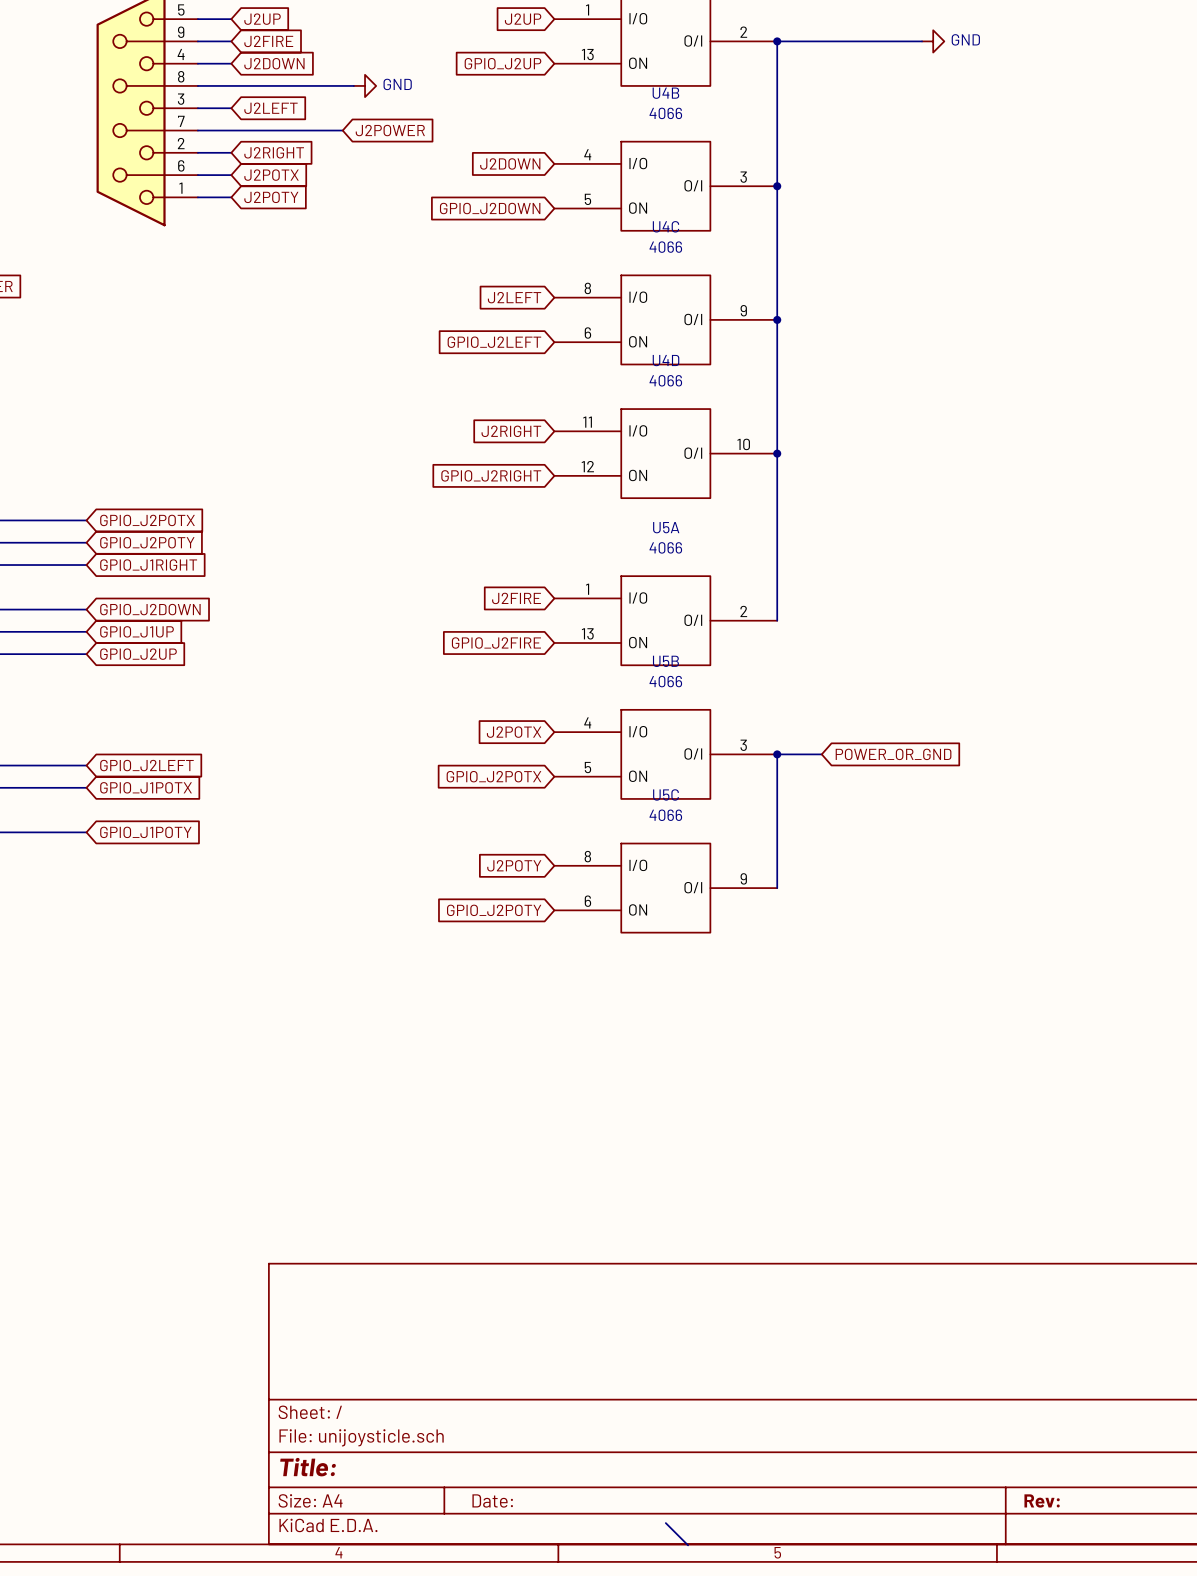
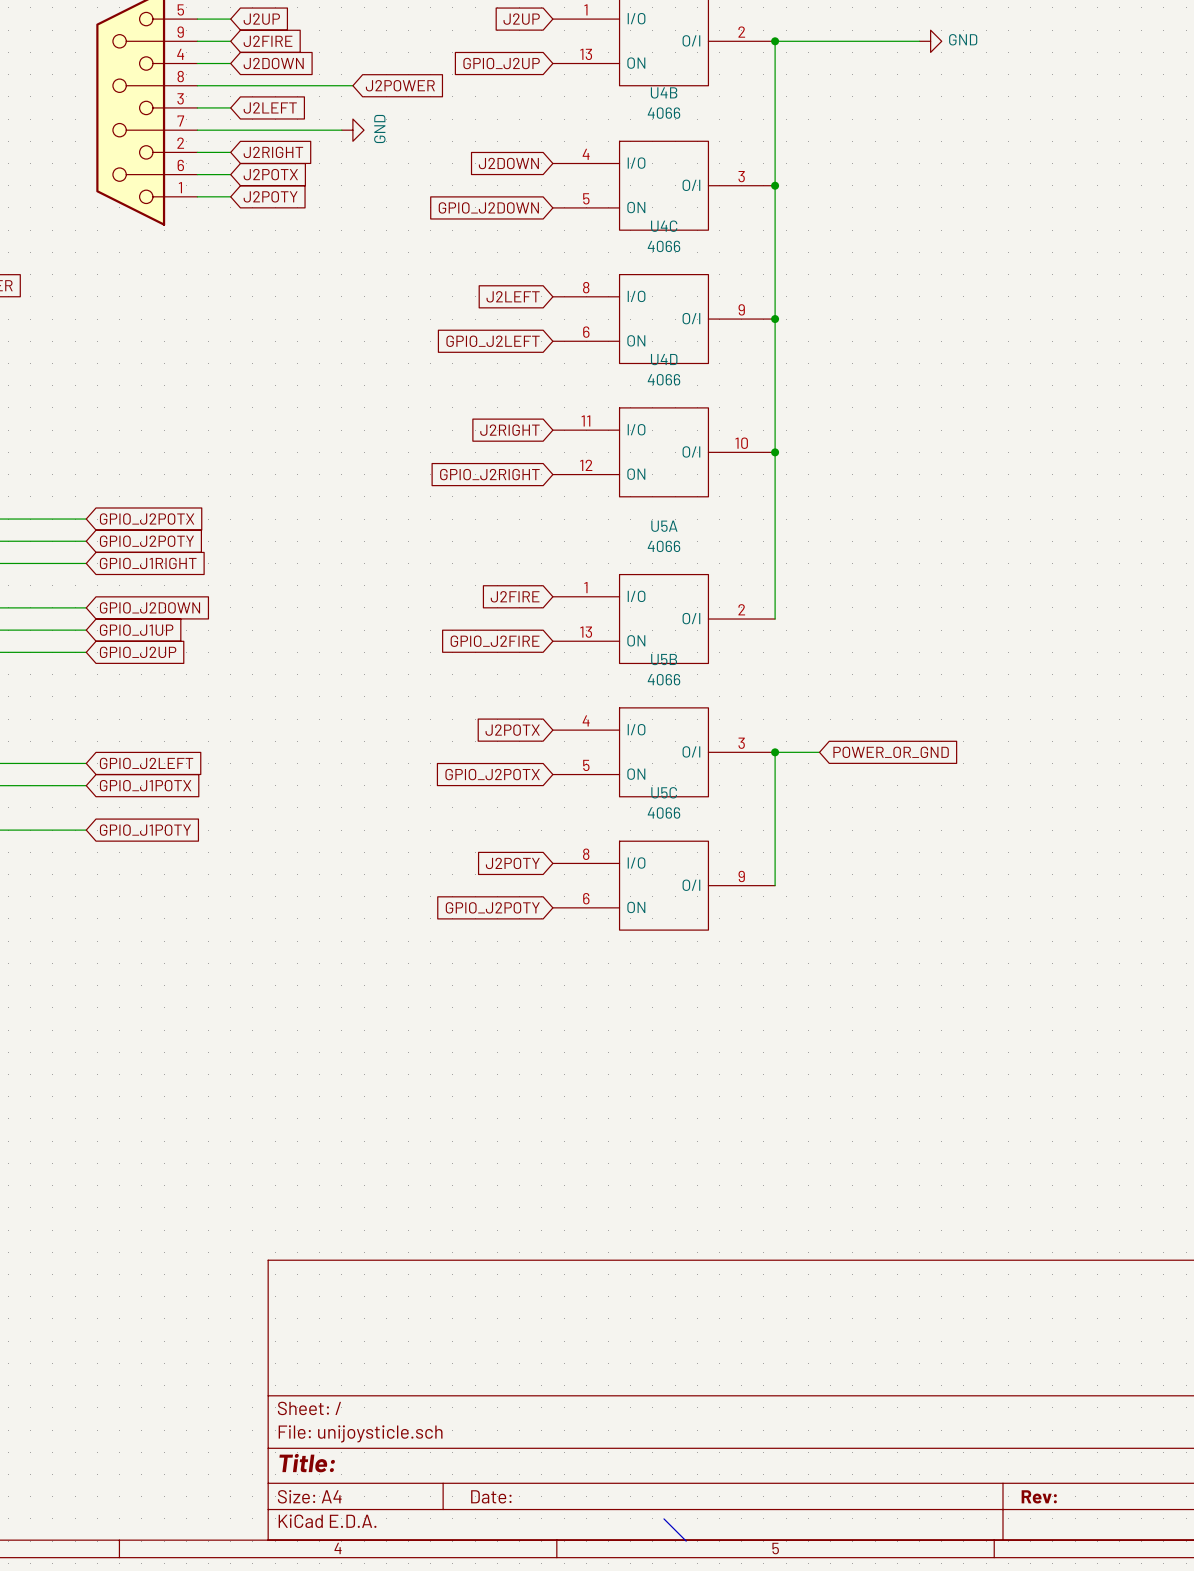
power symbol text rotation: 0° (397, 84) -> 90° counterclockwise (379, 128)
power symbol position: GND (365, 85) -> GND (352, 130)
global label position: J2POWER (390, 130) -> J2POWER (400, 85)

